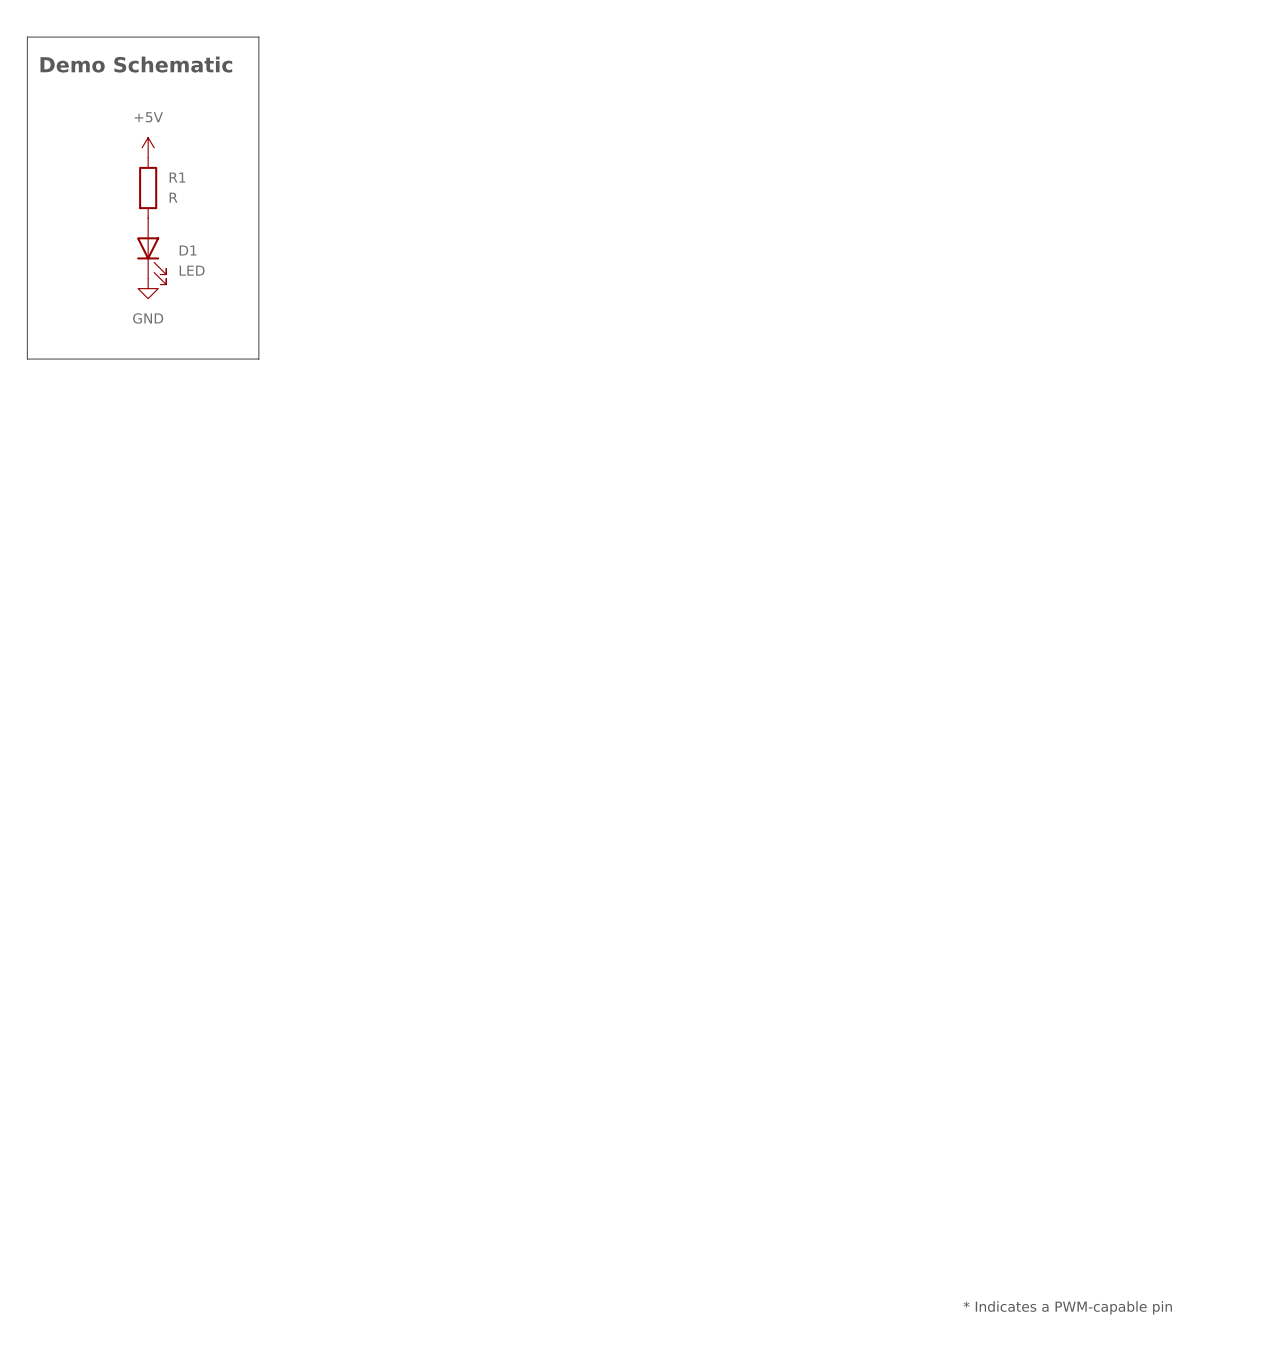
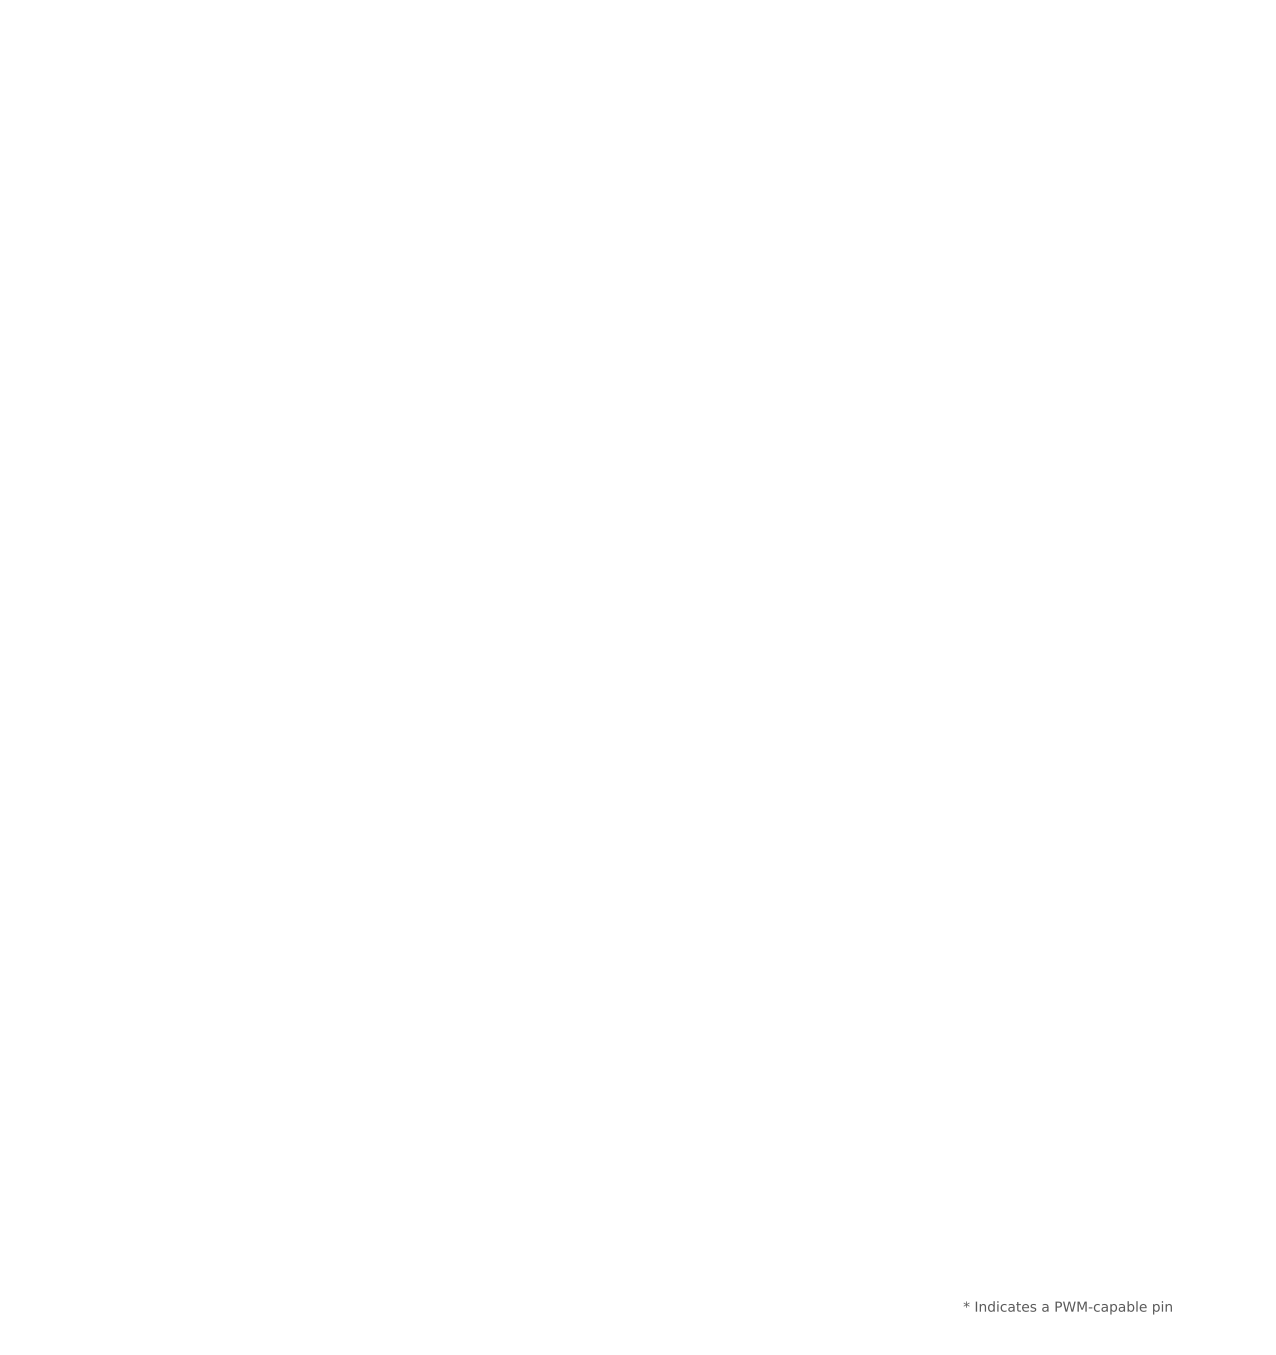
line: (27, 37) (258, 37) (258, 359) (27, 359) (27, 37) -> none
text: Demo Schematic (136, 64) -> none
power symbol: +5V (148, 147) -> none
R1: R (148, 188) -> none
D1: LED (151, 251) -> none
power symbol: GND (148, 288) -> none

